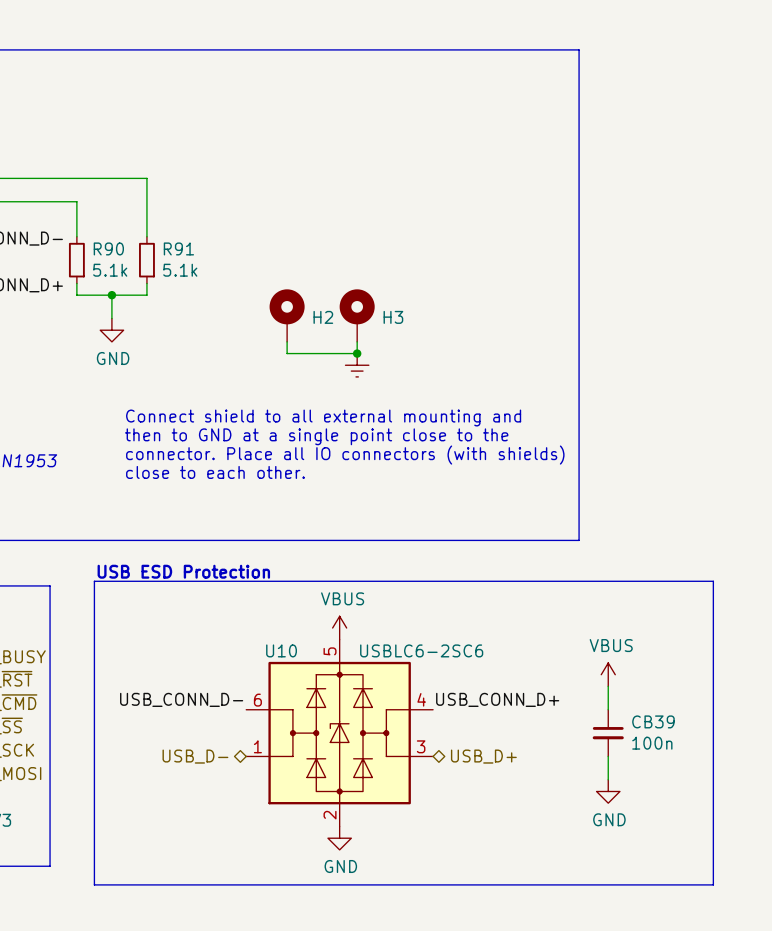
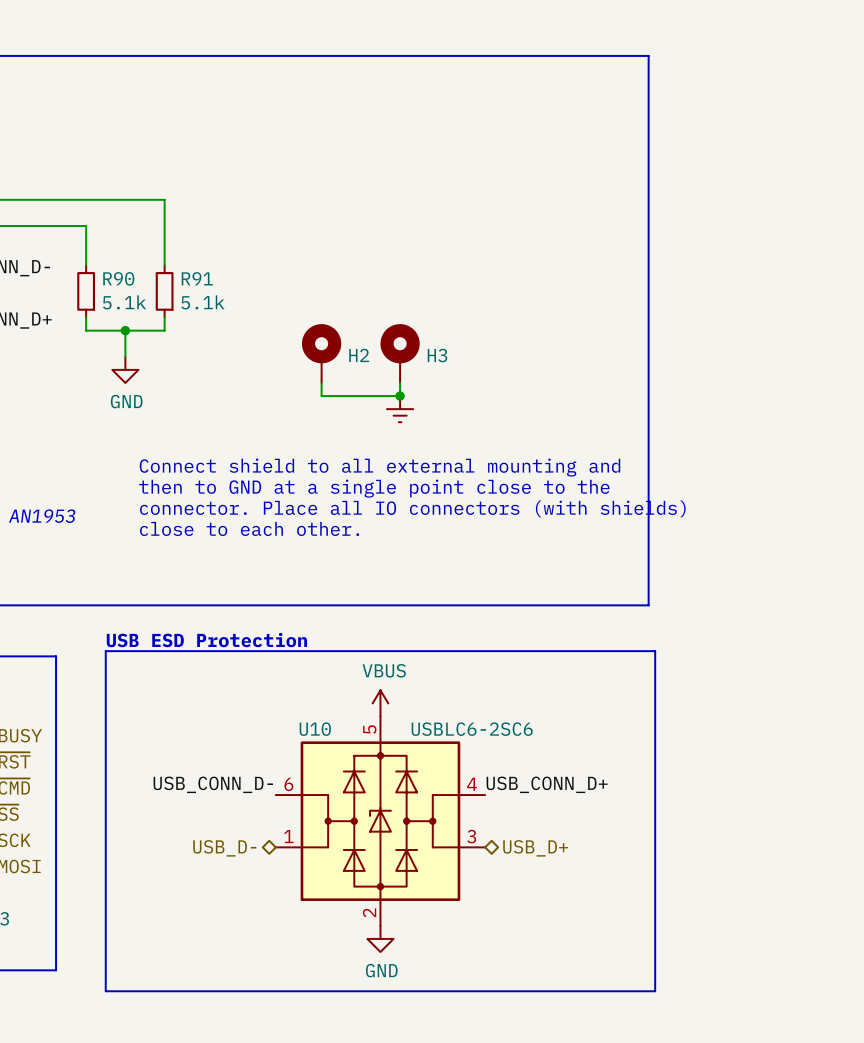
line: (584, 581) (713, 581) (713, 884) (584, 884) -> (655, 651) (655, 991)
power symbol: VBUS (608, 674) -> none
wire: (608, 686) (608, 709) -> none
CB39: 100n (608, 733) -> none
wire: (608, 756) (608, 779) -> none
power symbol: GND (608, 791) -> none

